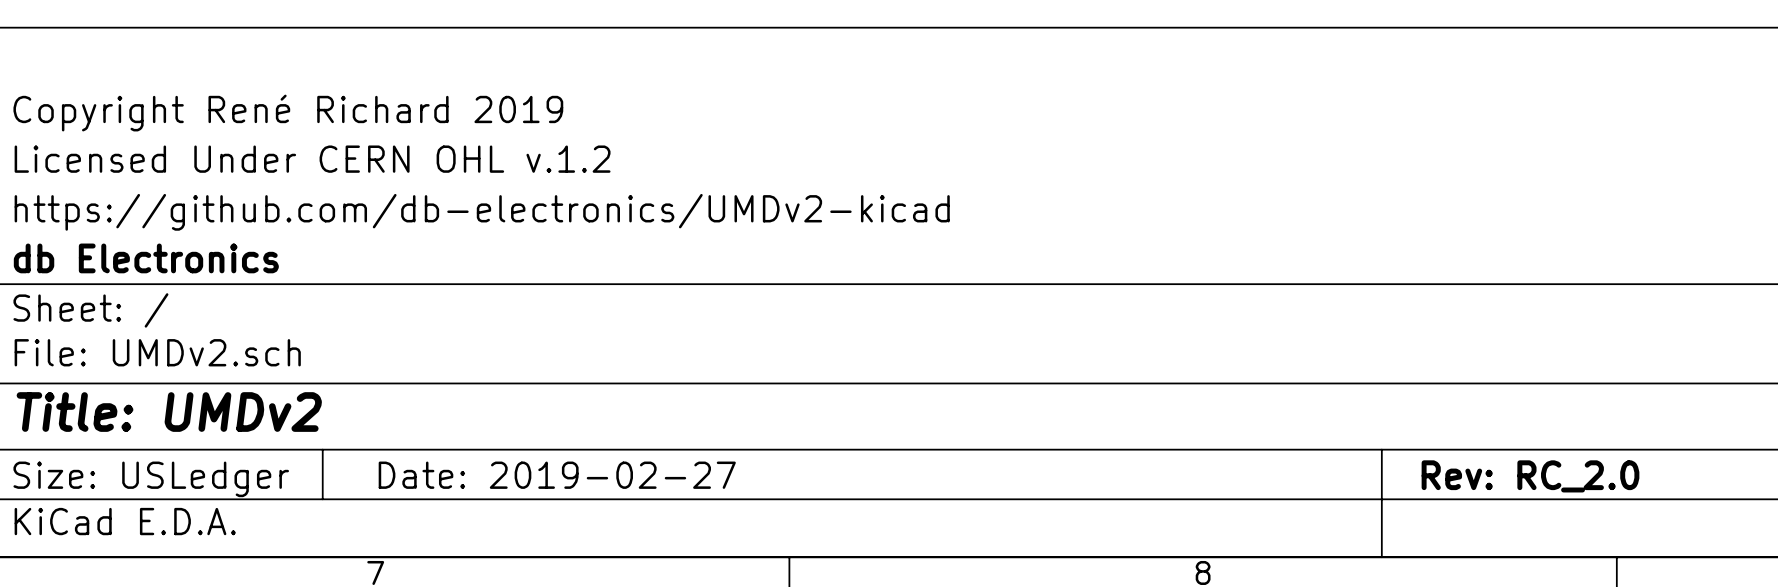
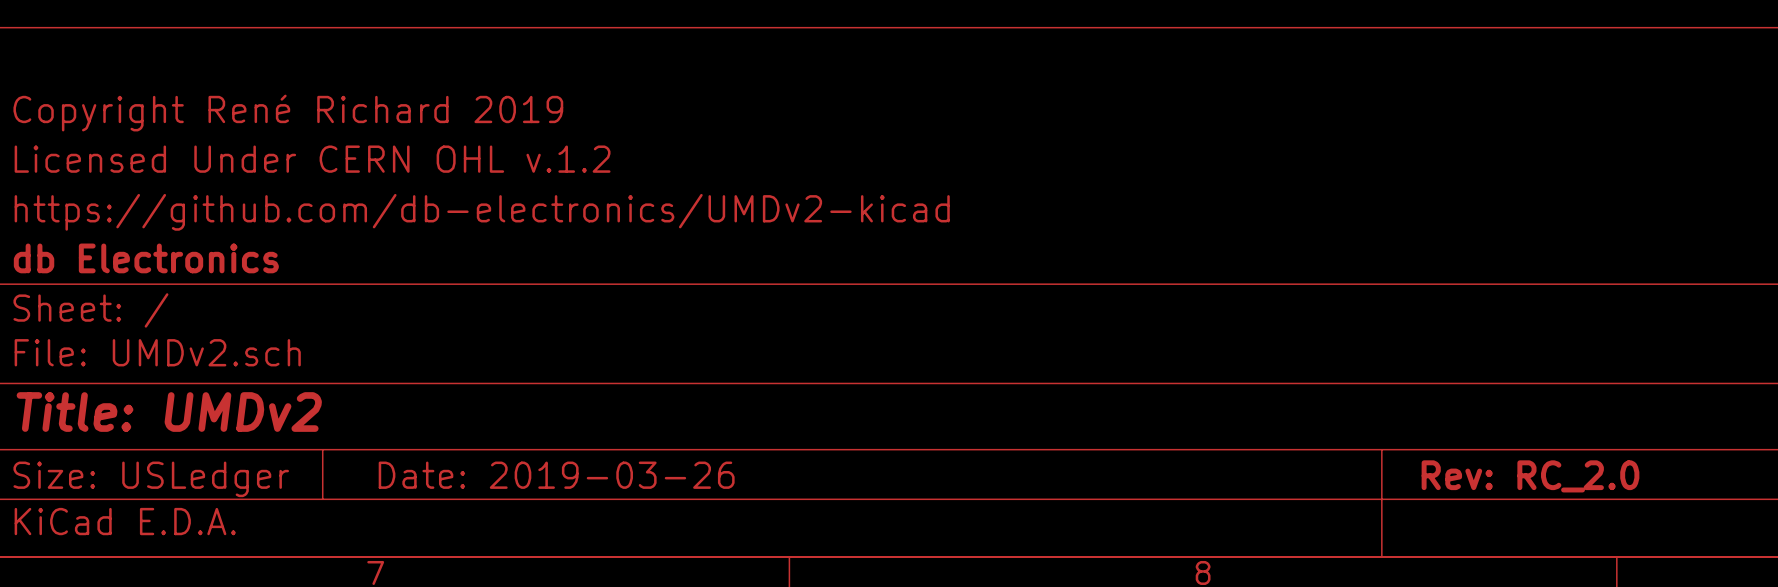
title block: Date: 2019-02-27 (557, 475) -> Date: 2019-03-26 (556, 475)

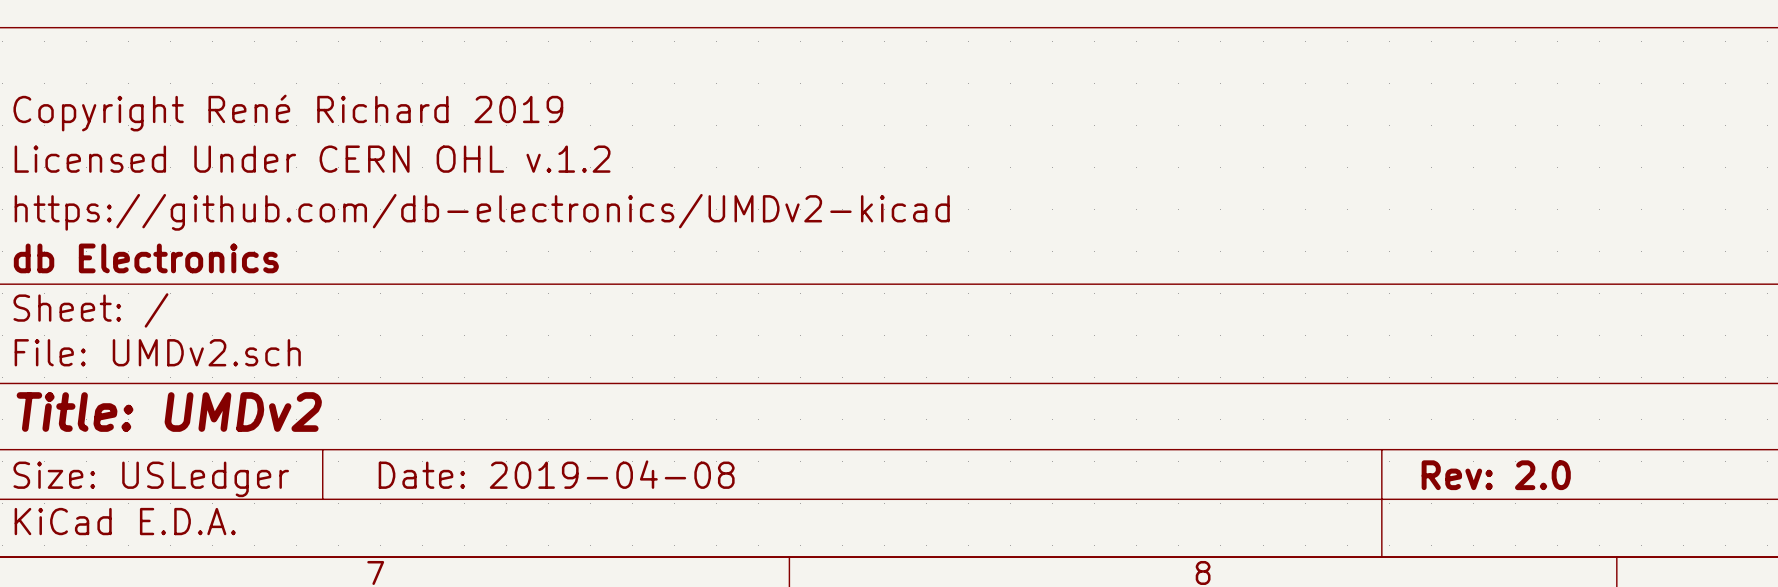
title block: Date: 2019-03-26 (556, 475) -> Date: 2019-04-08 (556, 474)
title block: Rev: RC_2.0 (1530, 476) -> Rev: 2.0 (1496, 475)

